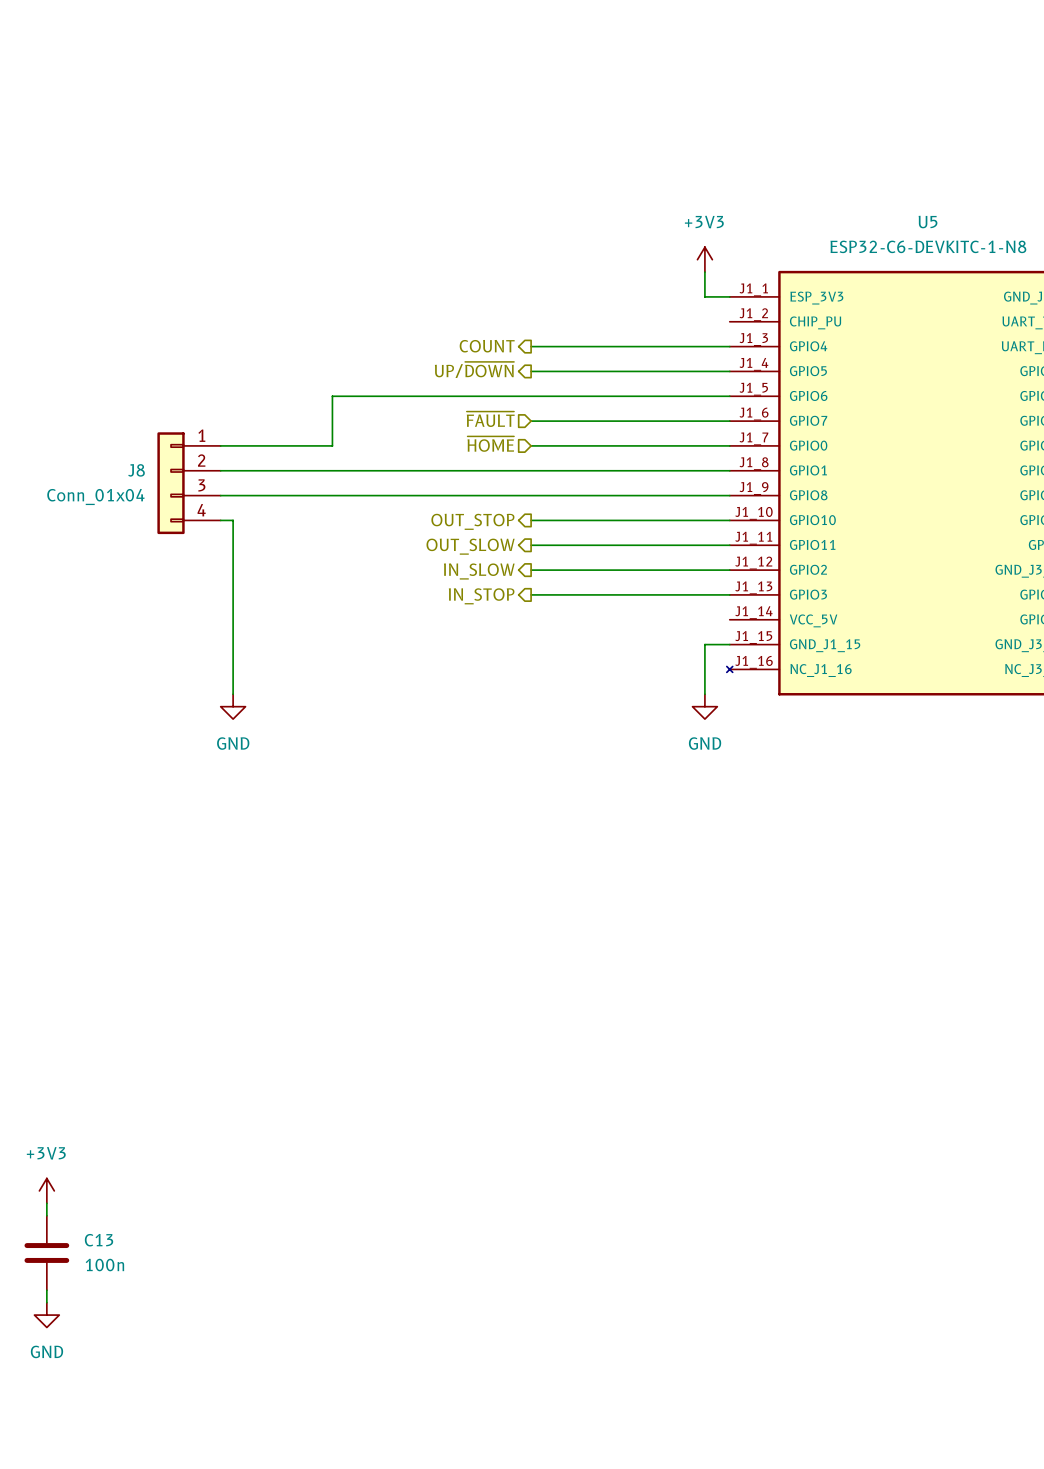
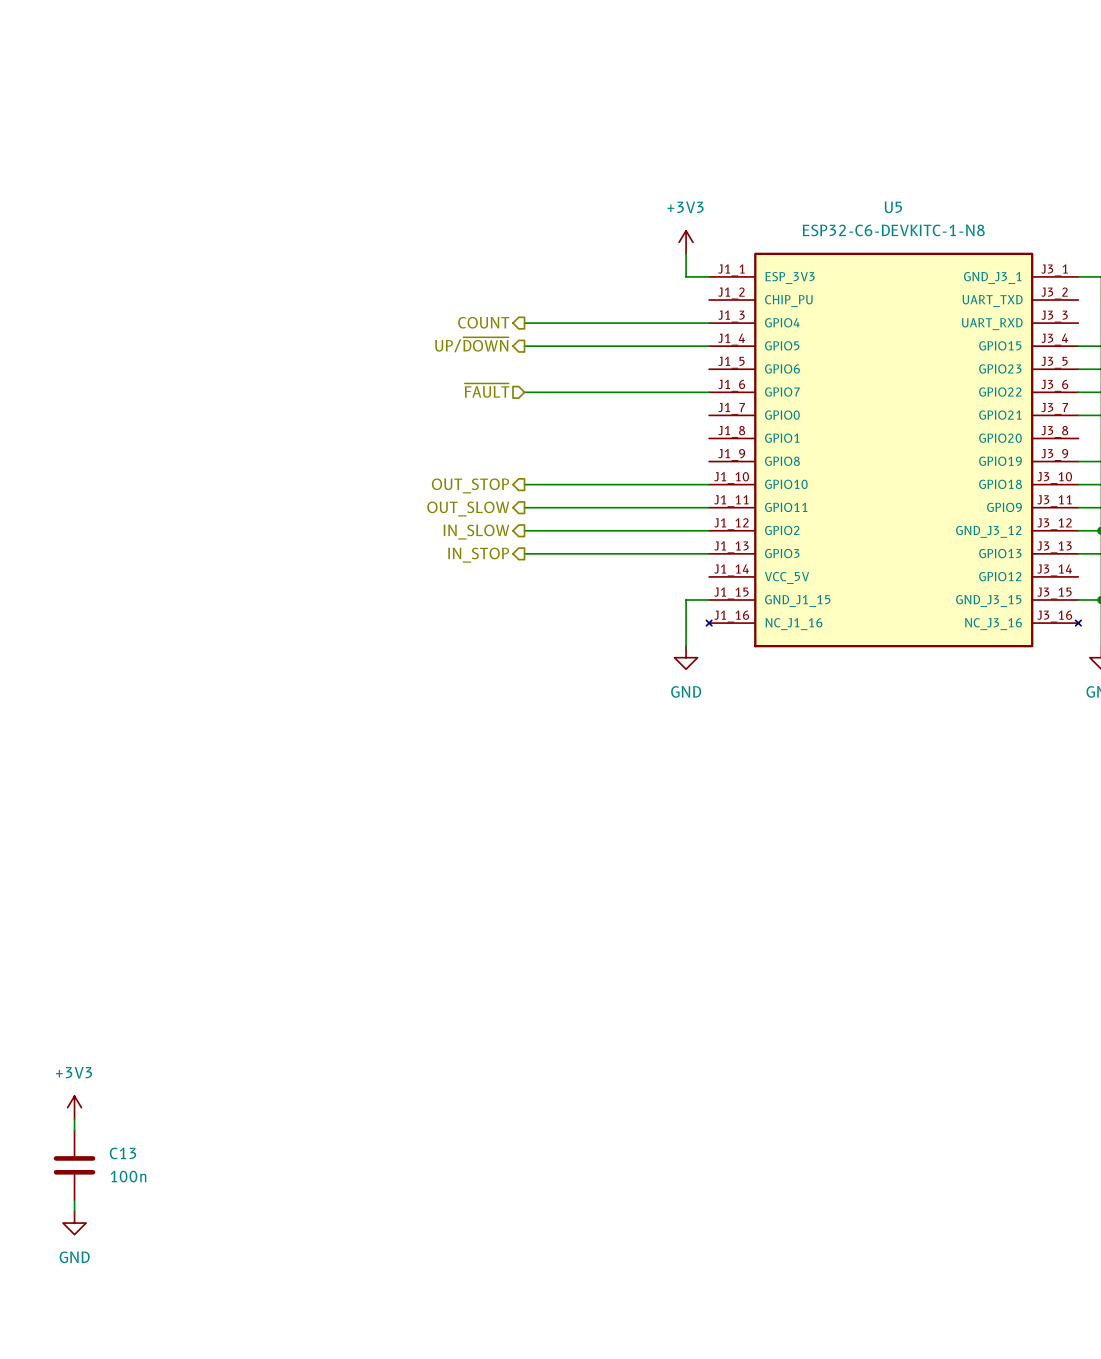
wire: (729, 396) (332, 396) (332, 445) (220, 445) -> none
hierarchical label: ~{HOME} (490, 444) -> none
wire: (531, 445) (729, 445) -> none
wire: (220, 470) (729, 470) -> none
J8: Conn_01x04 (189, 483) -> none
wire: (220, 495) (729, 495) -> none
wire: (220, 520) (233, 520) (233, 694) -> none
power symbol: GND (233, 706) -> none

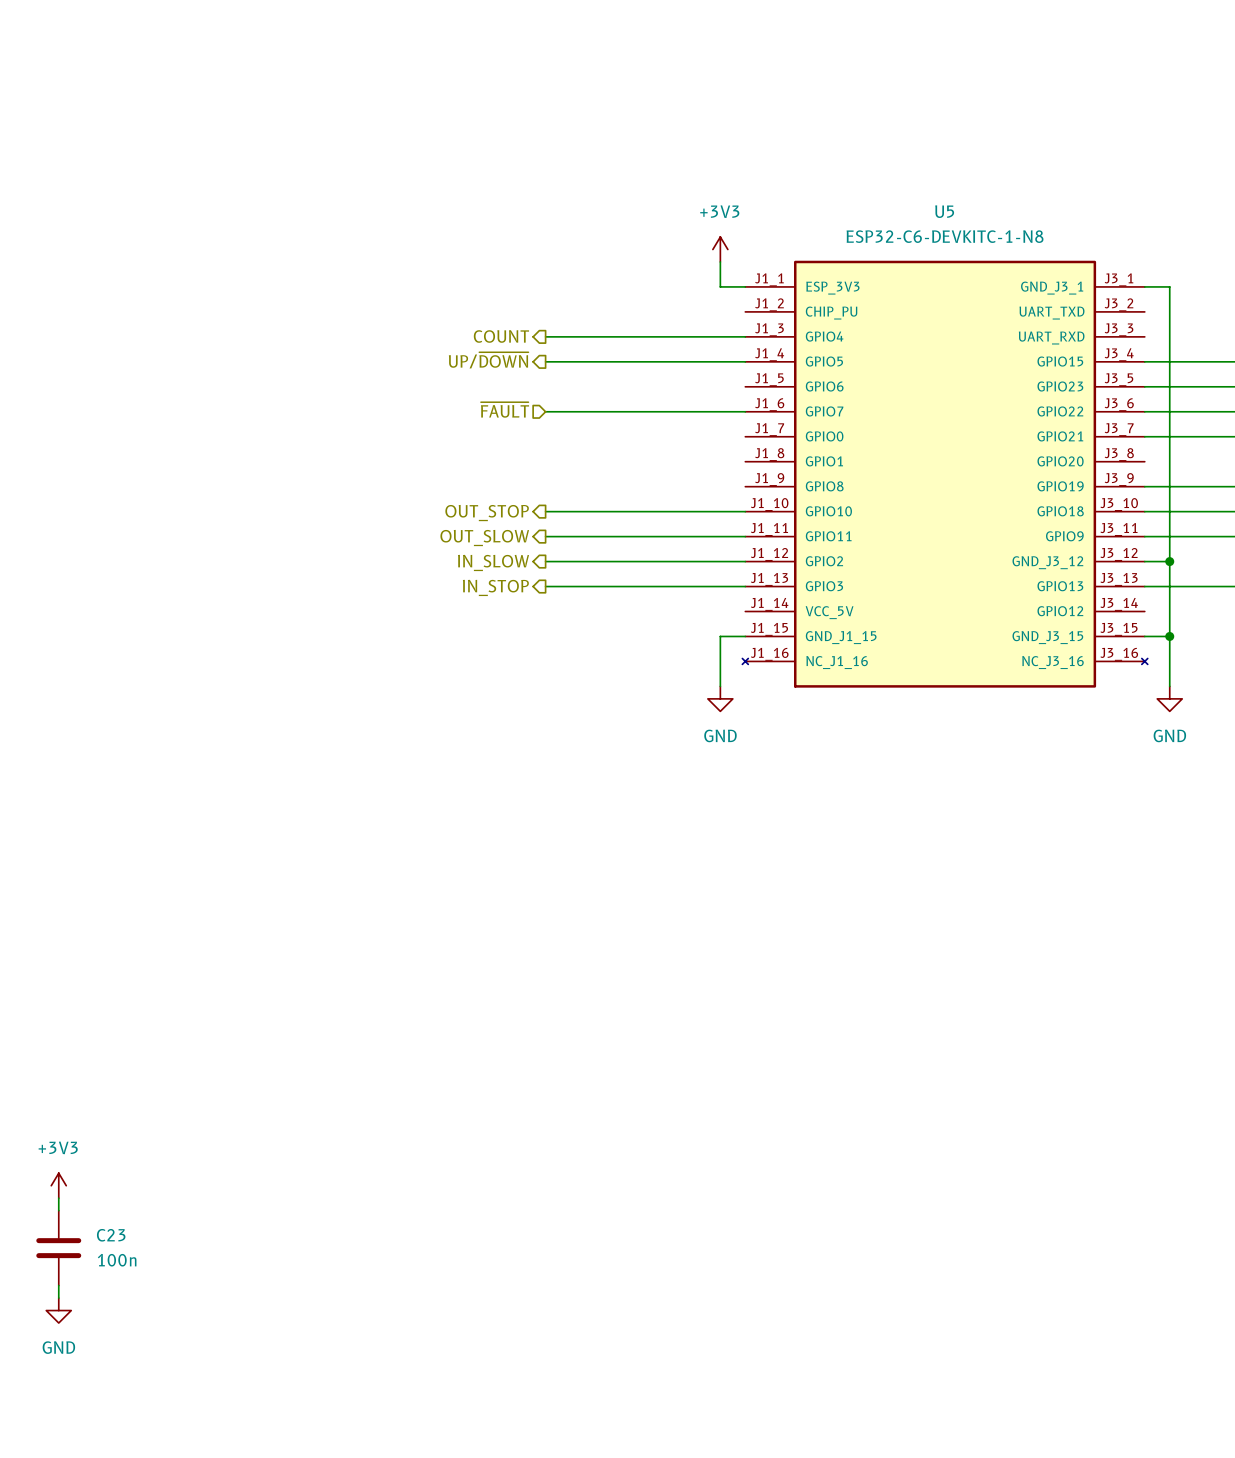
C13 name: C13 (122, 1153) -> C23 (111, 1235)

